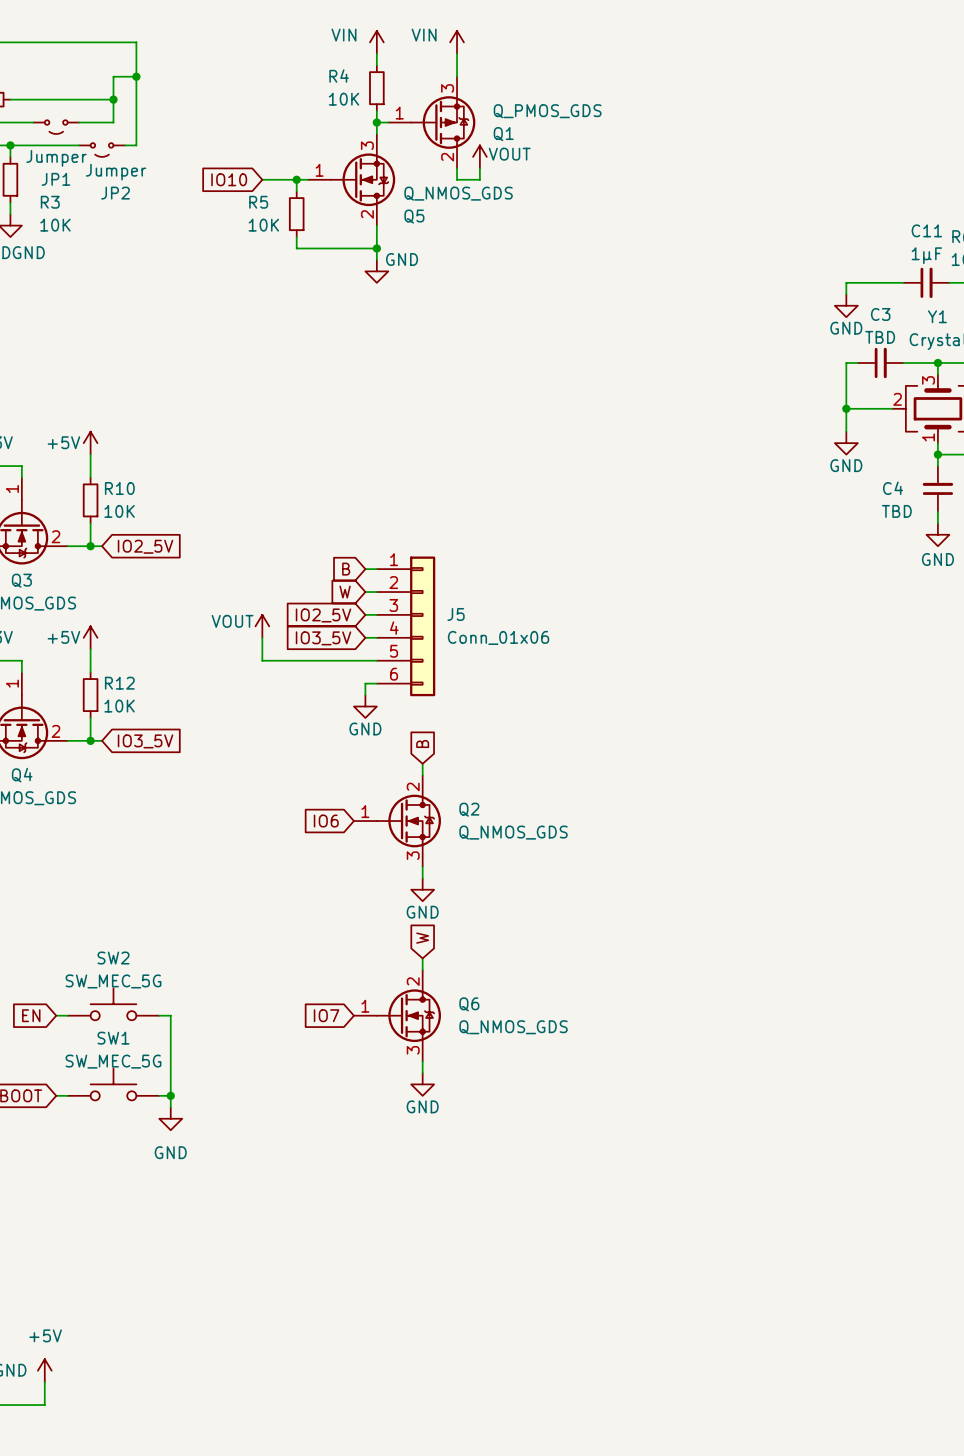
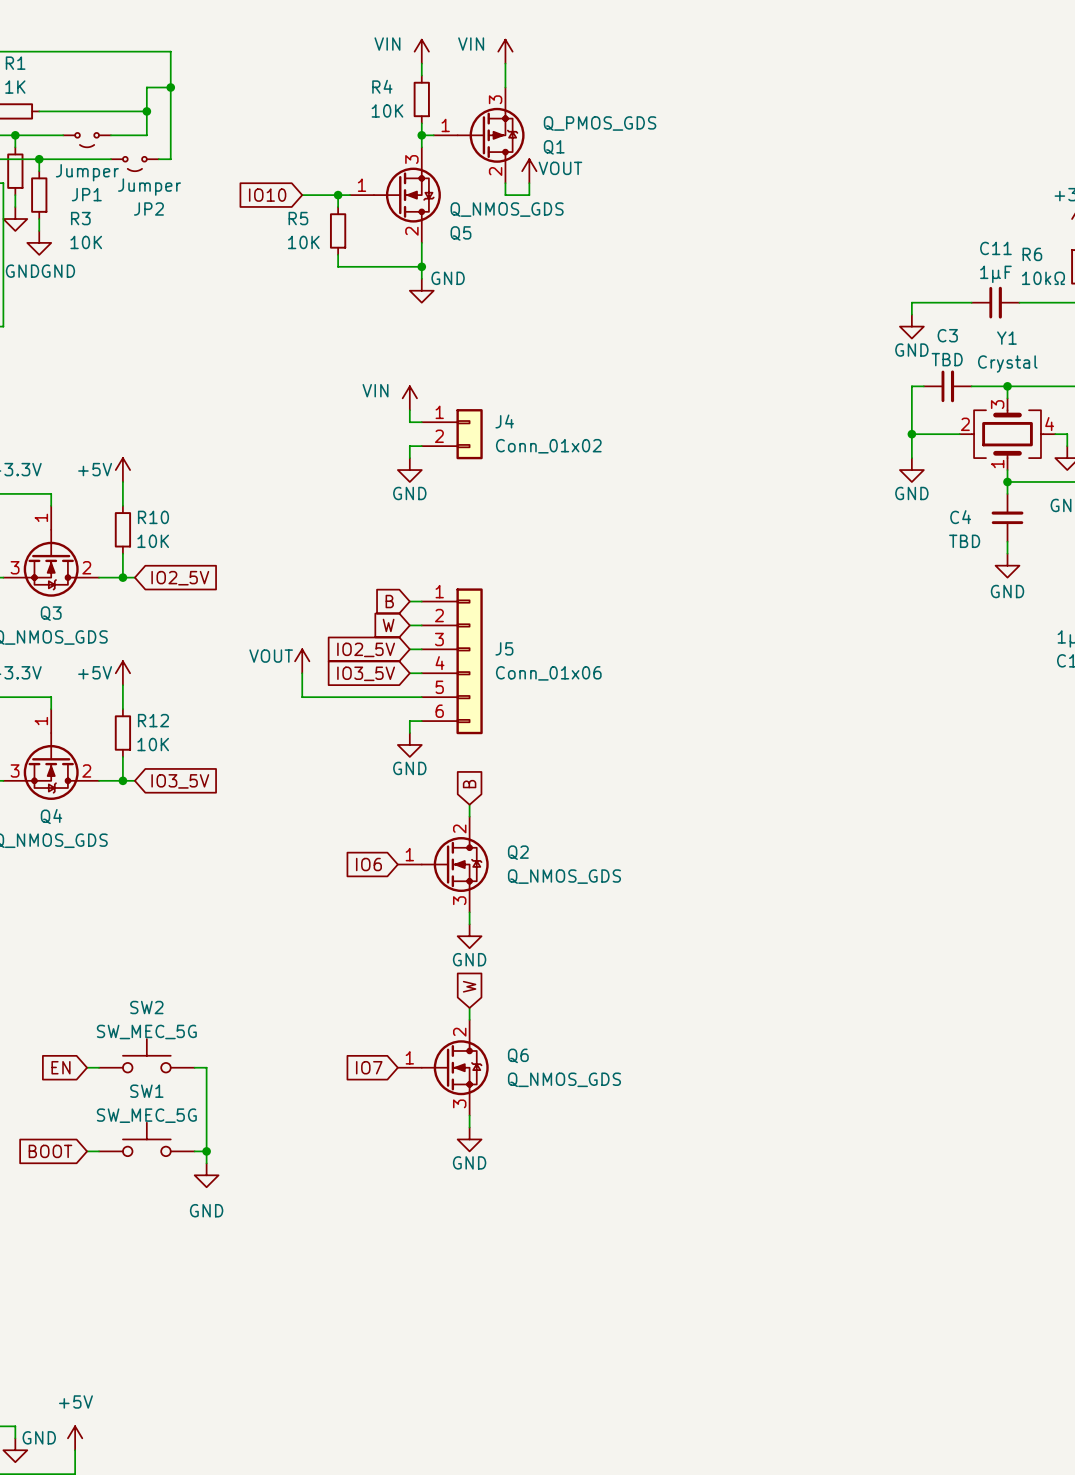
power symbol: none -> VIN (409, 398)
wire: none -> (409, 410) (409, 422) (421, 422)
J4: none -> Conn_01x02 (452, 434)
wire: none -> (421, 446) (409, 446) (409, 458)
power symbol: none -> GND (409, 470)

